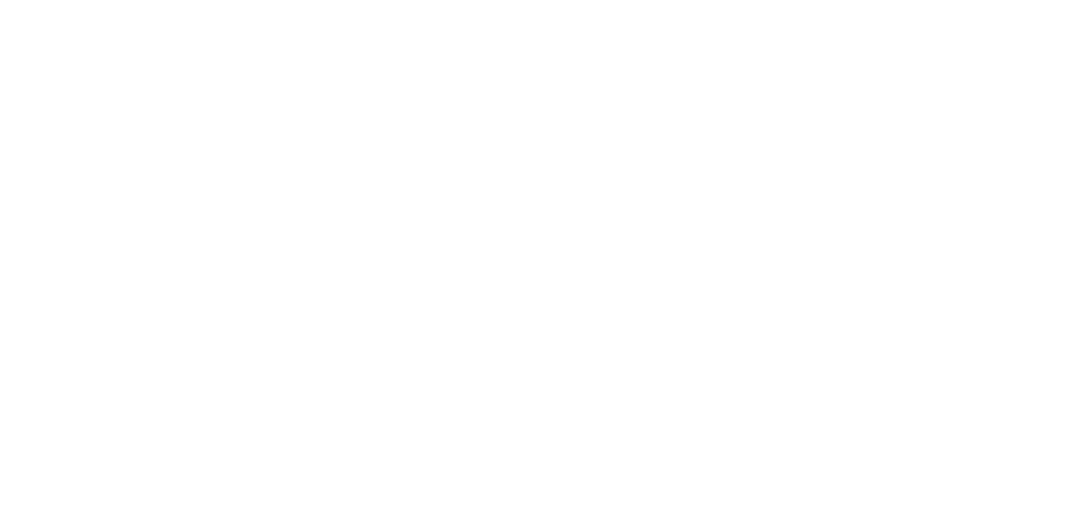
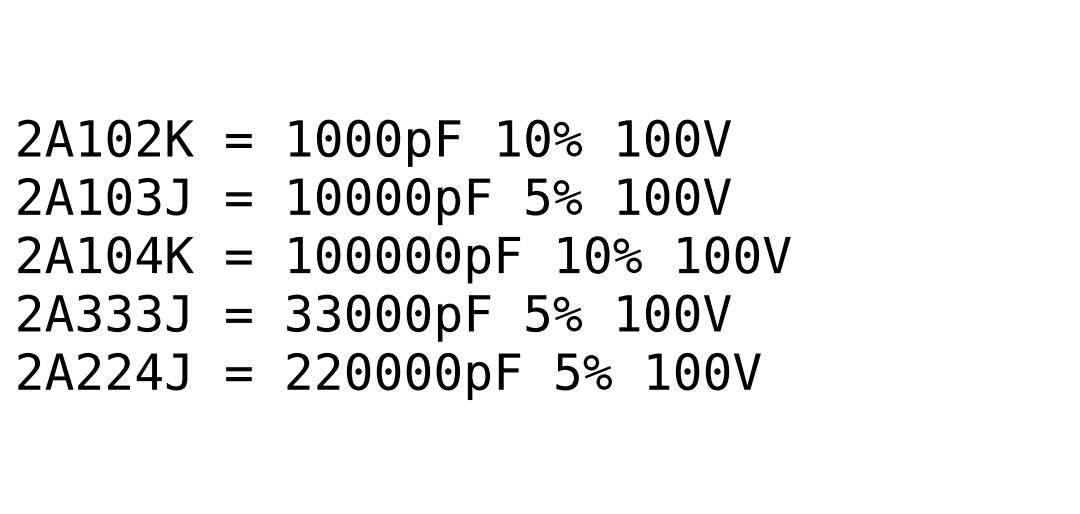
text: none -> 2A102K = 1000pF 10% 100V (374, 143)
text: none -> 2A103J = 10000pF 5% 100V (374, 201)
text: none -> 2A104K = 100000pF 10% 100V (404, 259)
text: none -> 2A333J = 33000pF 5% 100V (374, 318)
text: none -> 2A224J = 220000pF 5% 100V (389, 376)

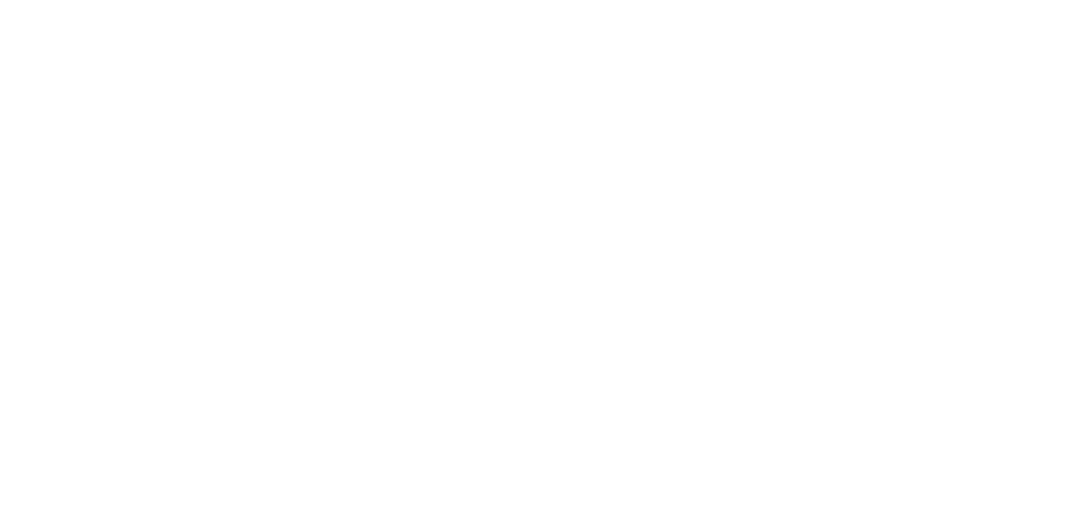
text: 2A102K = 1000pF 10% 100V (374, 143) -> none
text: 2A103J = 10000pF 5% 100V (374, 201) -> none
text: 2A104K = 100000pF 10% 100V (404, 259) -> none
text: 2A333J = 33000pF 5% 100V (374, 318) -> none
text: 2A224J = 220000pF 5% 100V (389, 376) -> none

